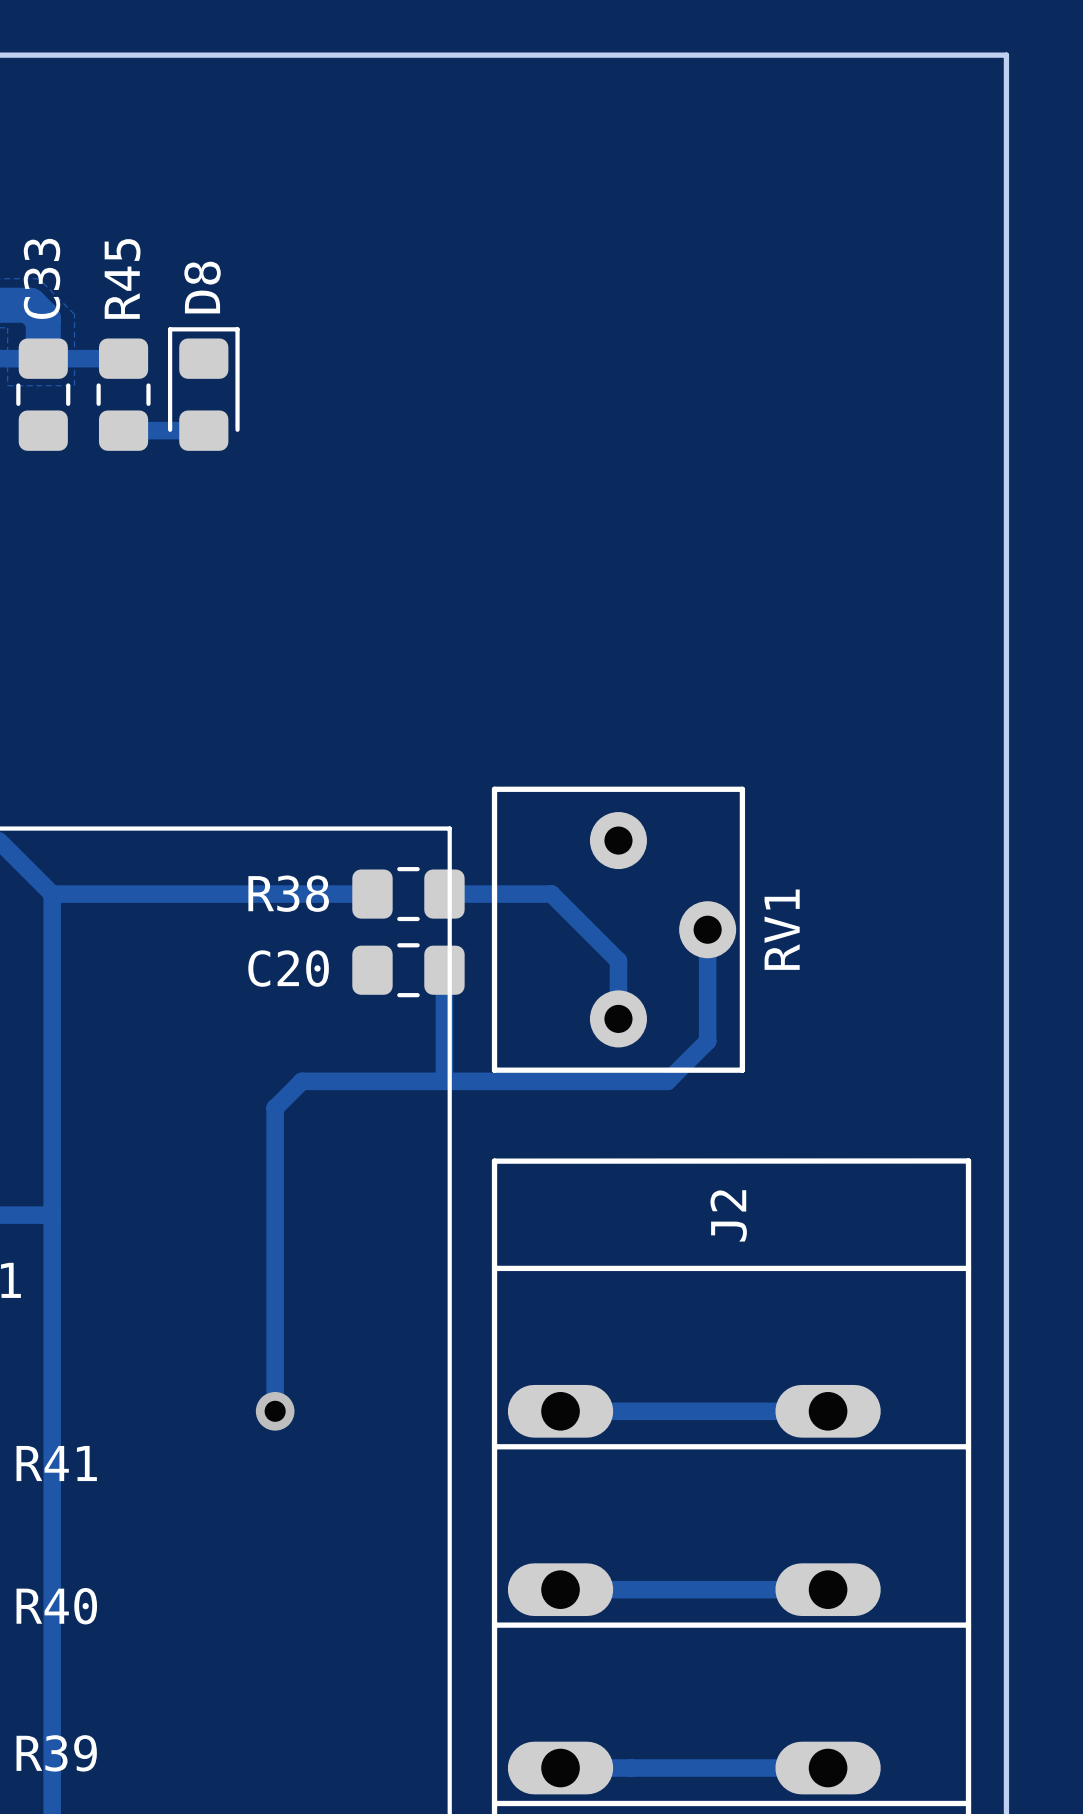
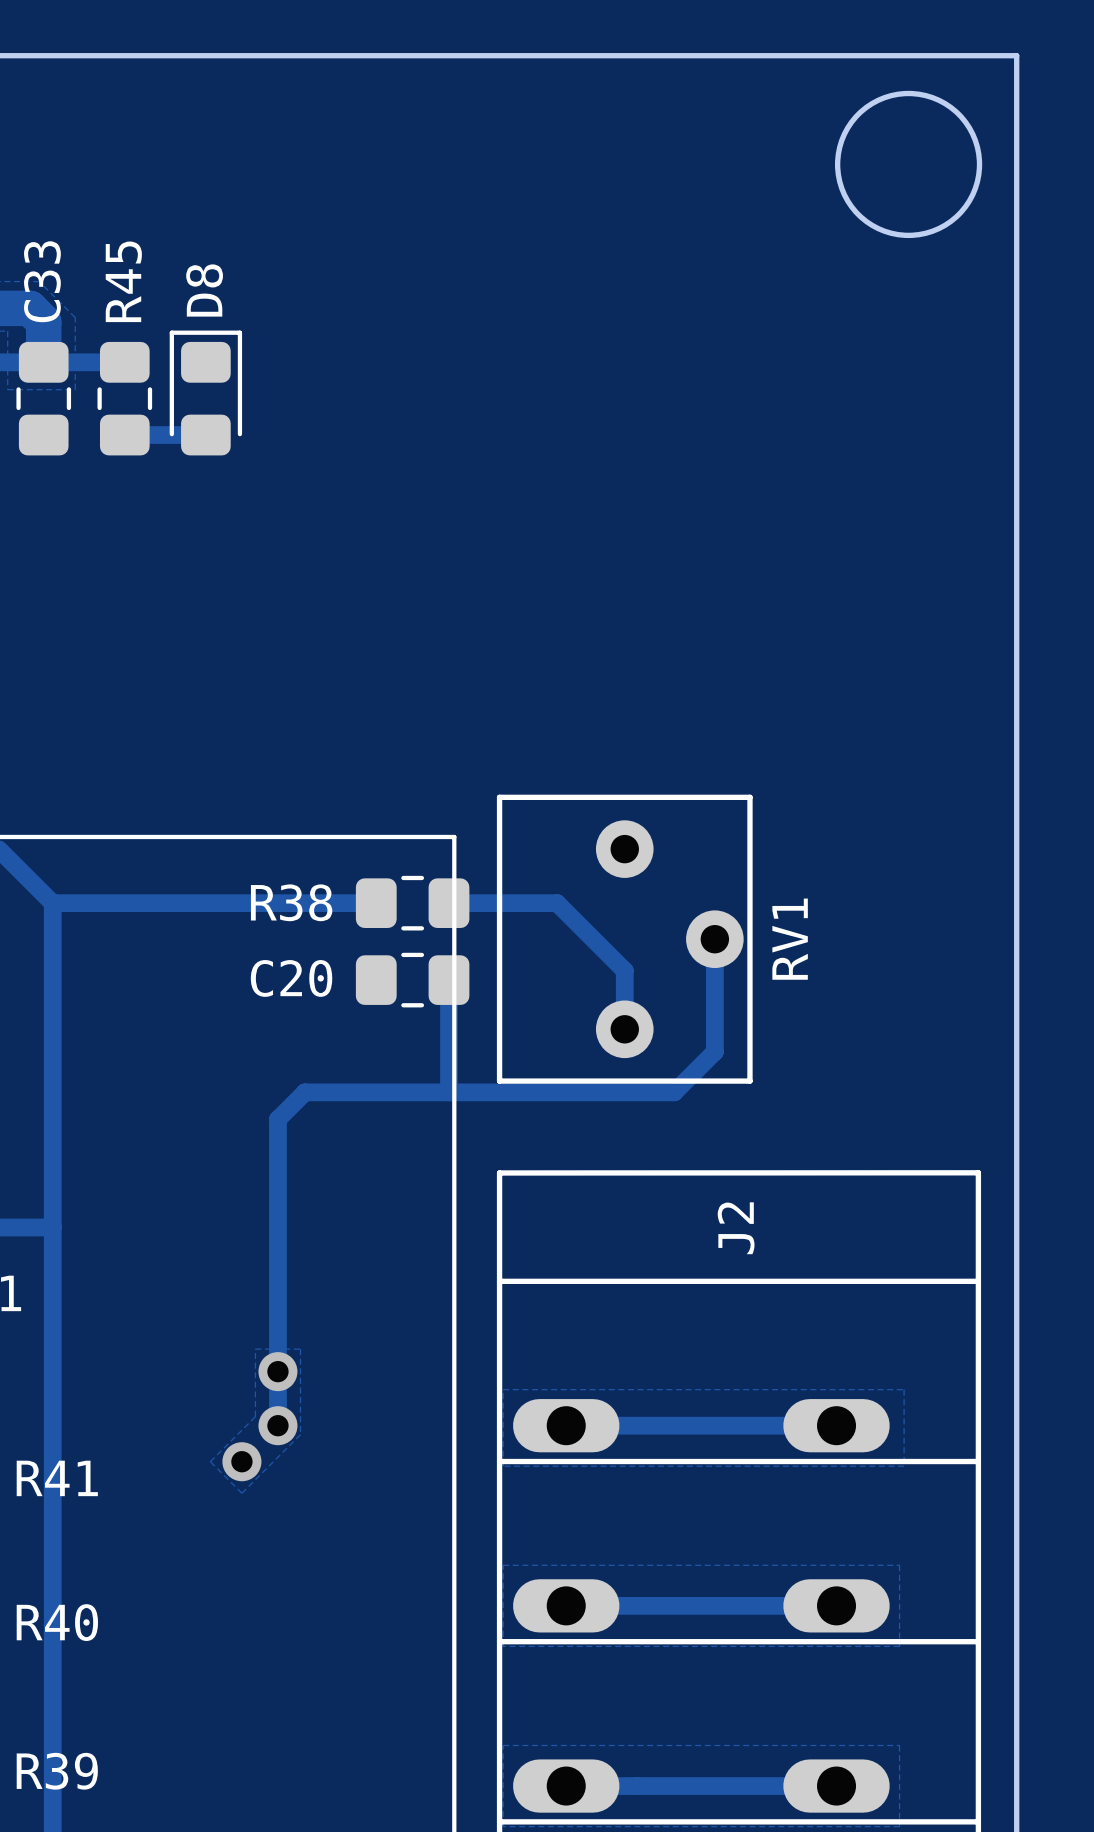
round board edge: none -> [834, 90, 983, 239]
zone outline: none -> (255, 1349) (300, 1349) (300, 1434) (241, 1493) (210, 1461) (255, 1416) (255, 1349)
via: none -> (277, 1371)
zone outline: none -> (503, 1389) (904, 1389) (904, 1466) (503, 1466) (503, 1389)
via: none -> (241, 1461)
zone outline: none -> (503, 1565) (503, 1646) (899, 1646) (899, 1565) (503, 1565)
zone outline: none -> (503, 1745) (503, 1826) (899, 1826) (899, 1745) (503, 1745)

